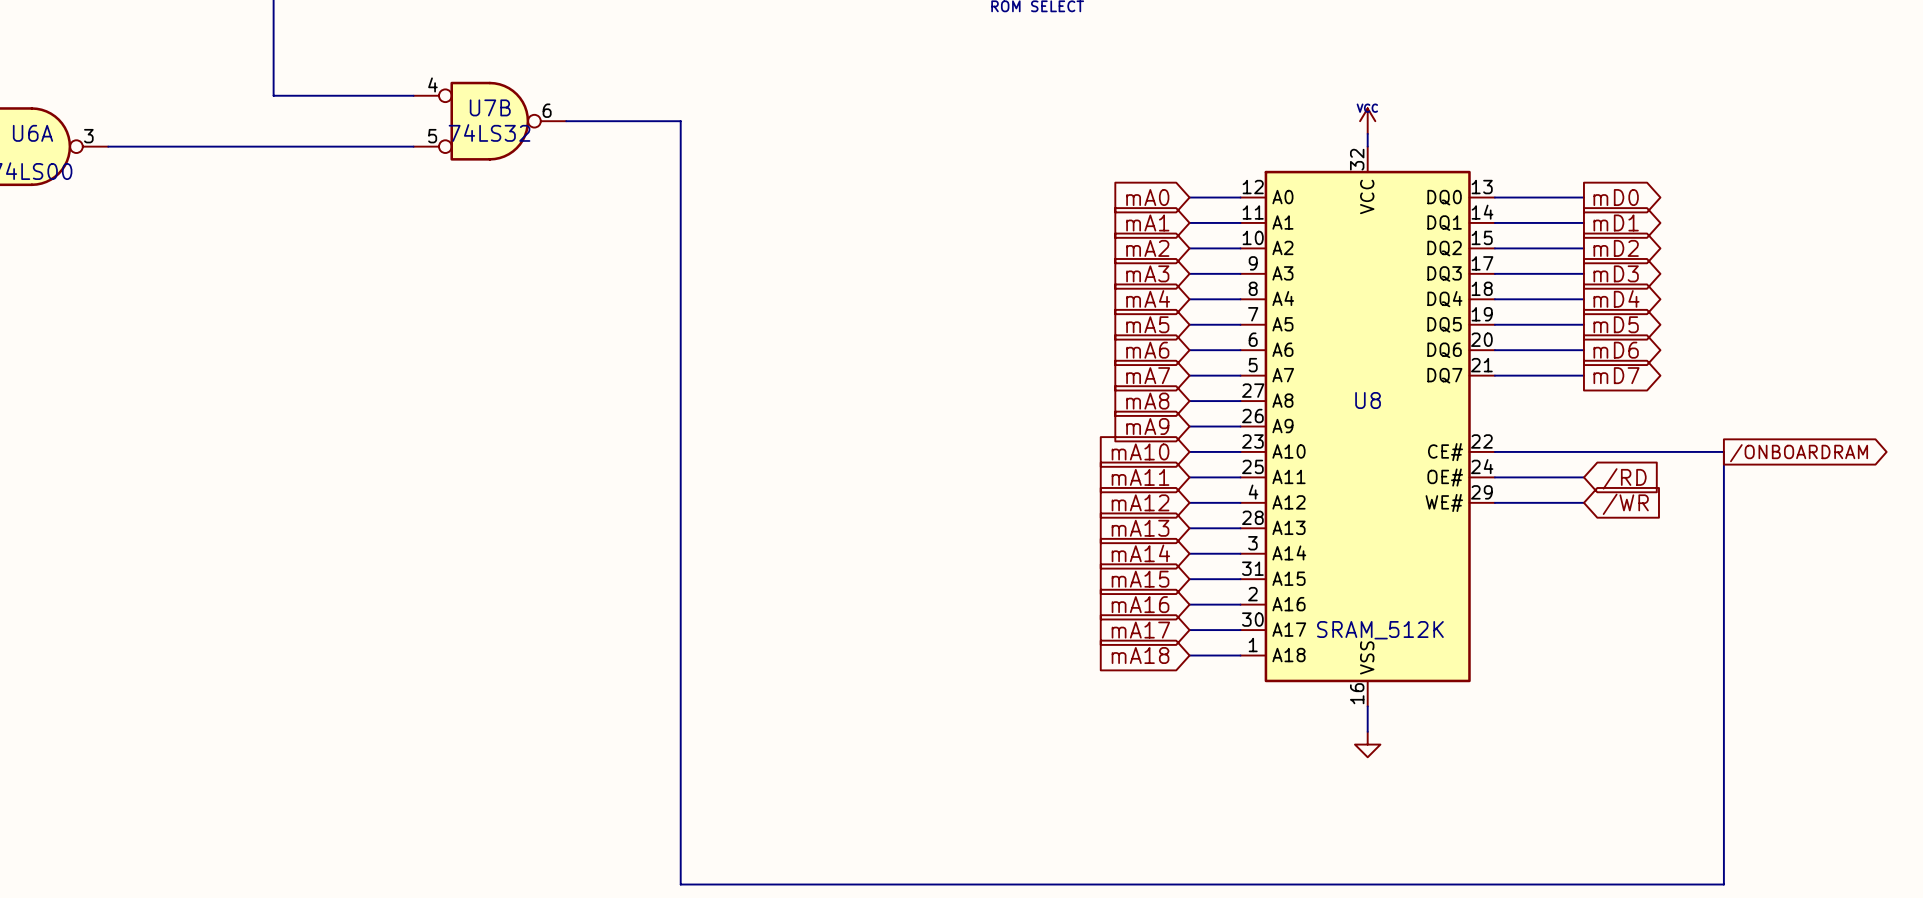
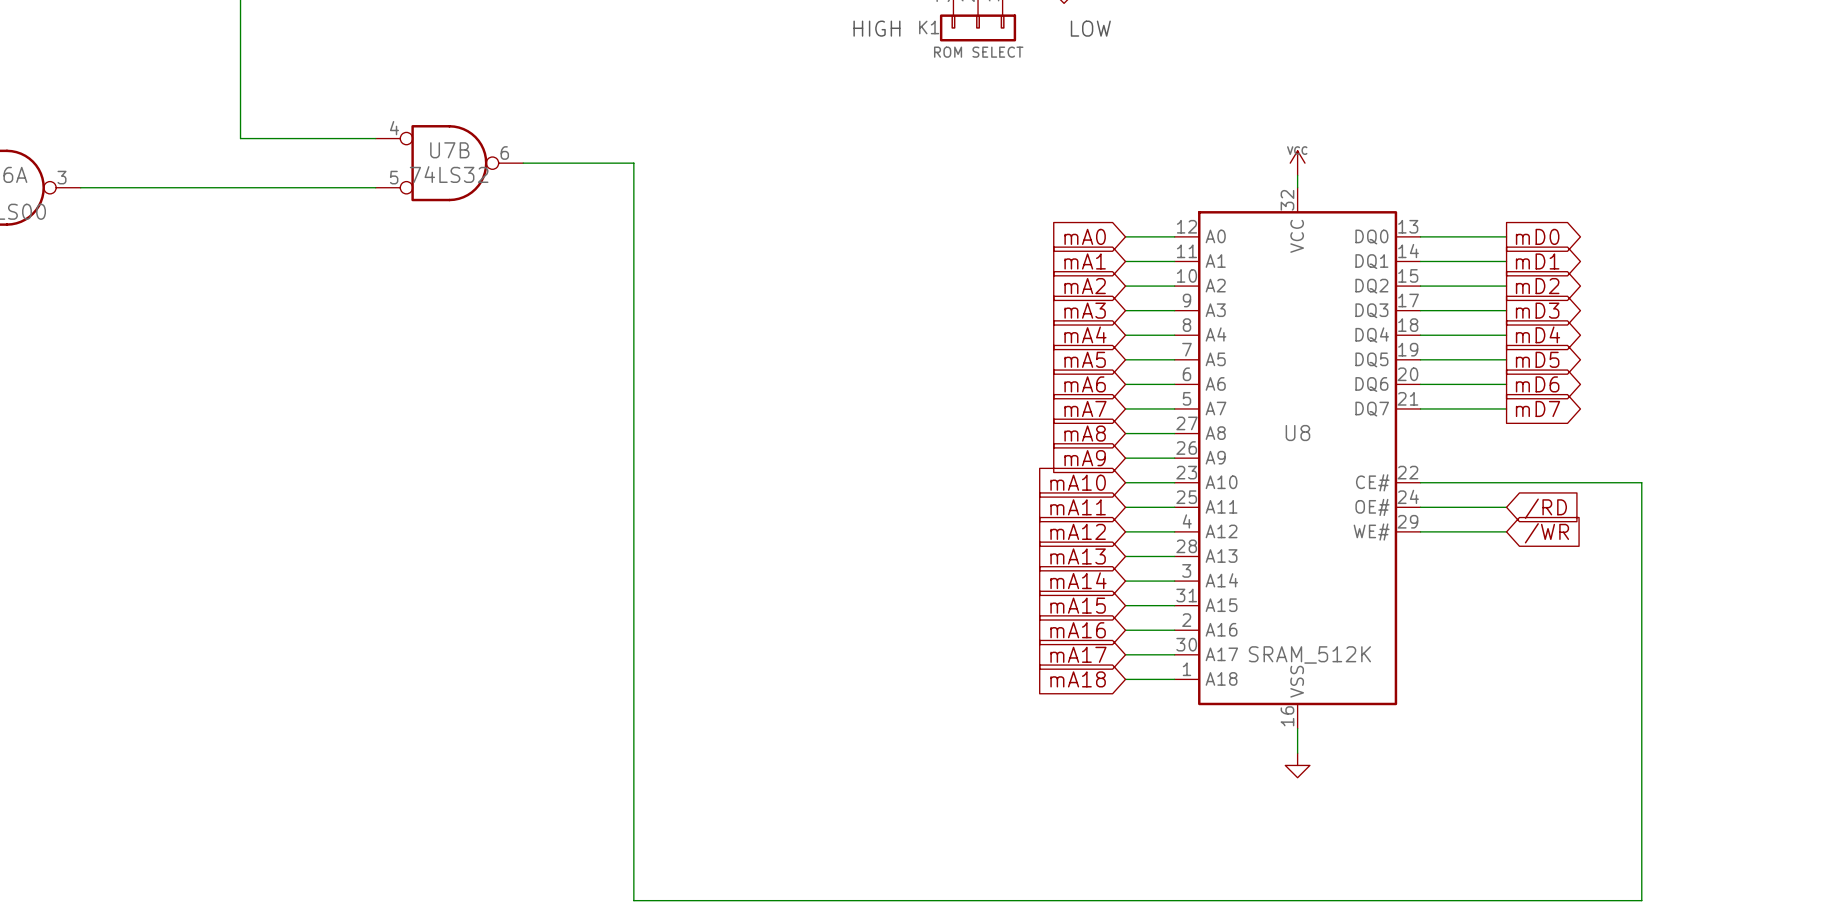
global label: /ONBOARDRAM (1799, 453) -> none

